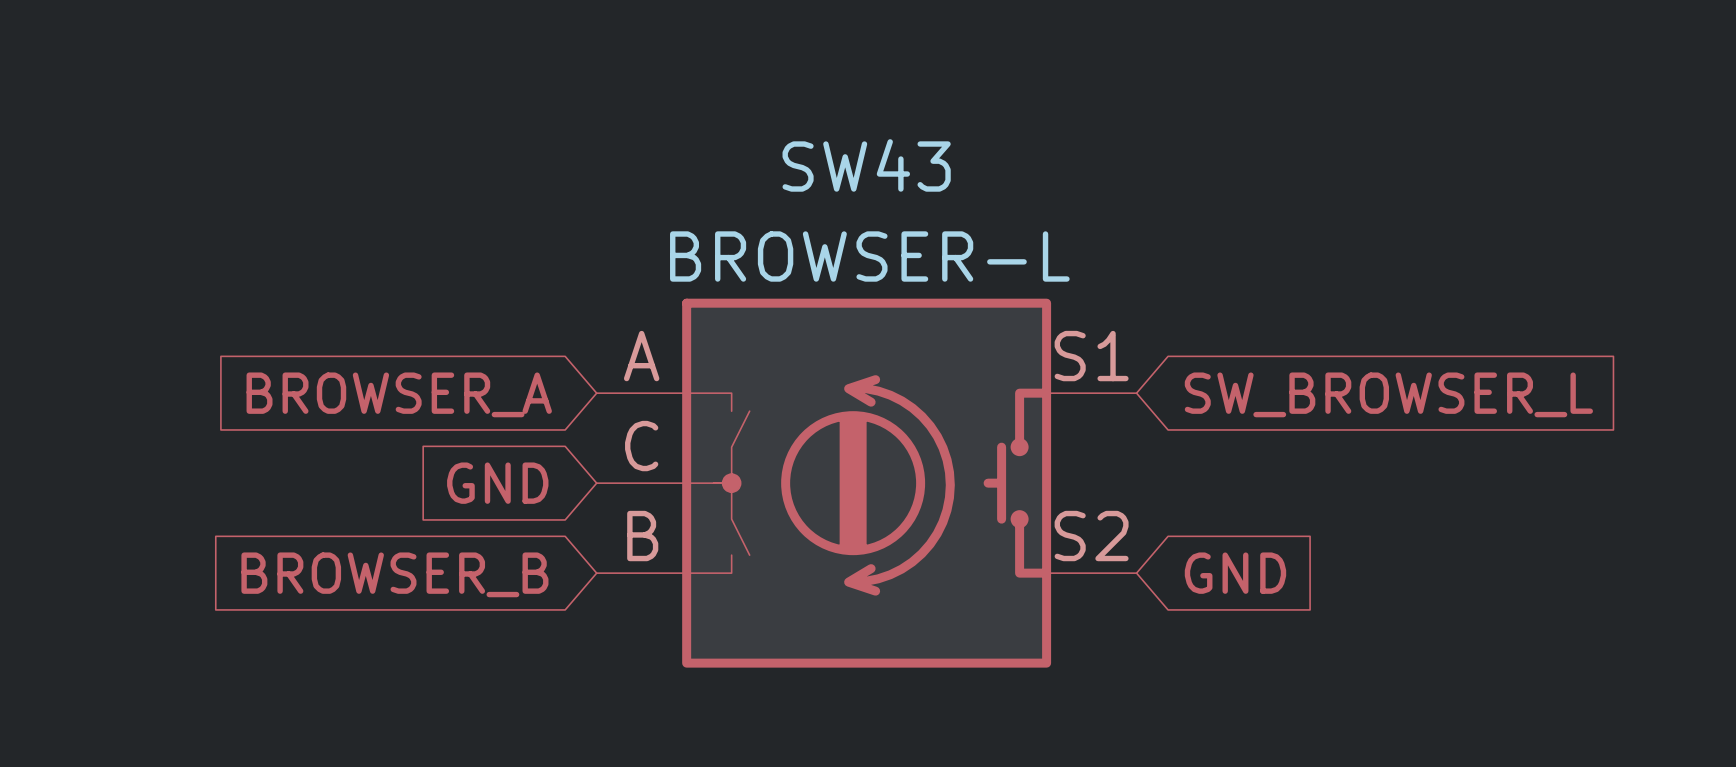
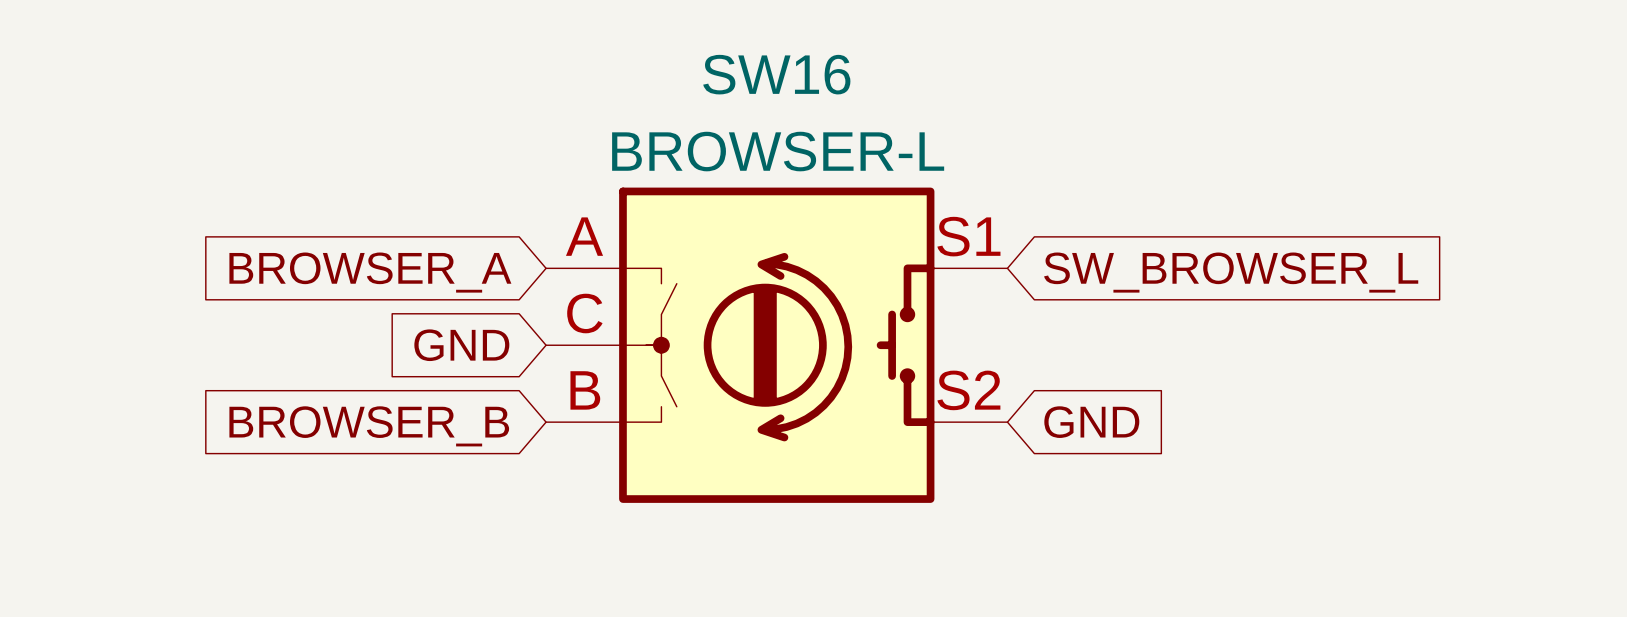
SW43 name: SW43 (866, 165) -> SW16 (776, 74)

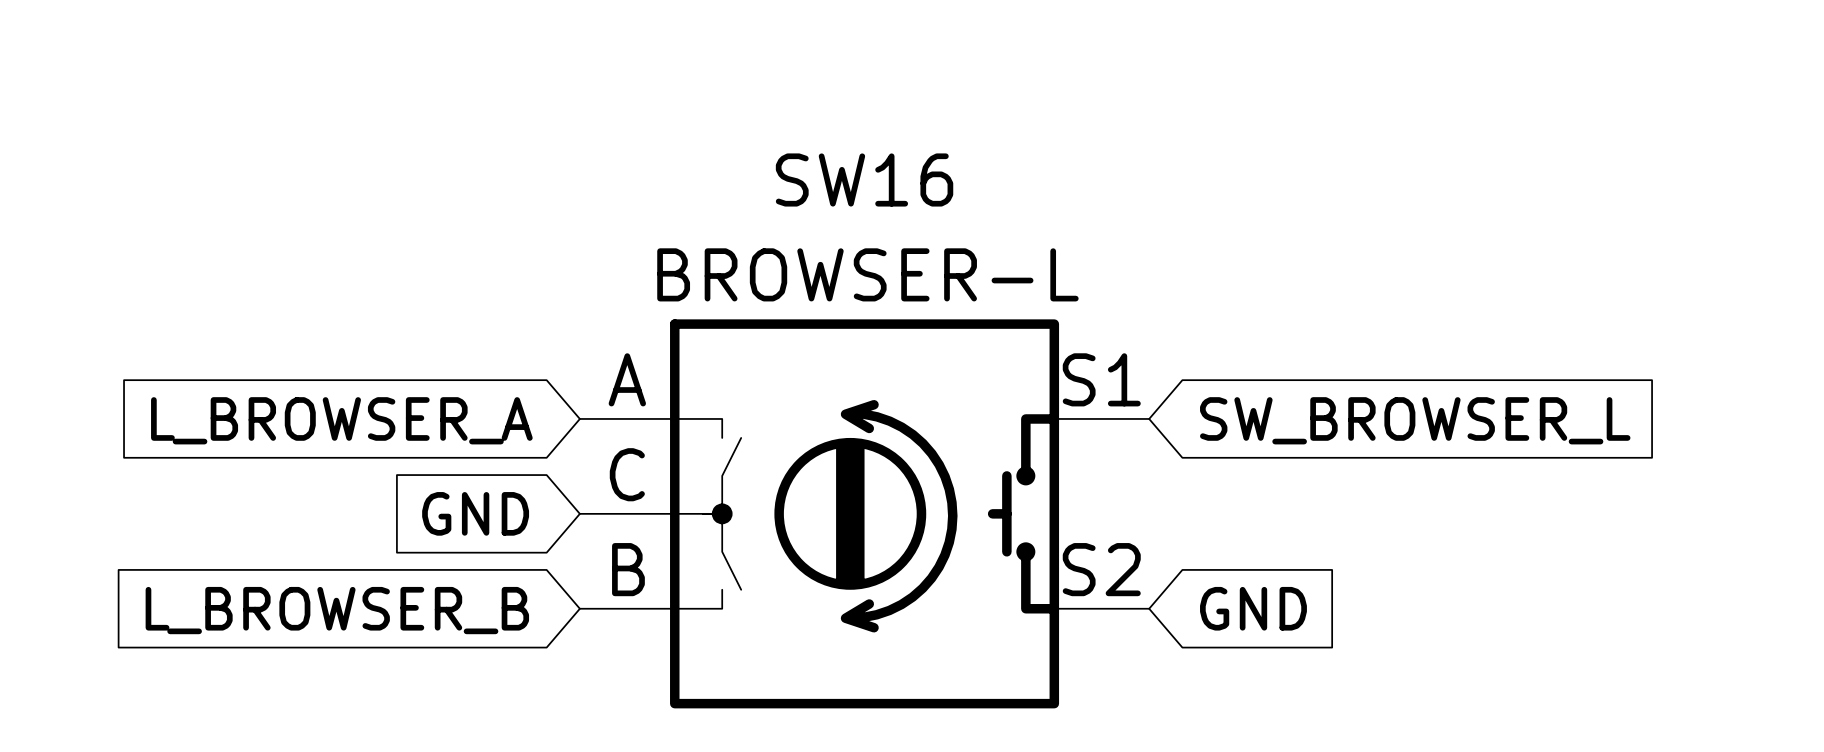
global label: BROWSER_A (370, 272) -> L_BROWSER_A (341, 420)
global label: BROWSER_B (369, 426) -> L_BROWSER_B (337, 610)

